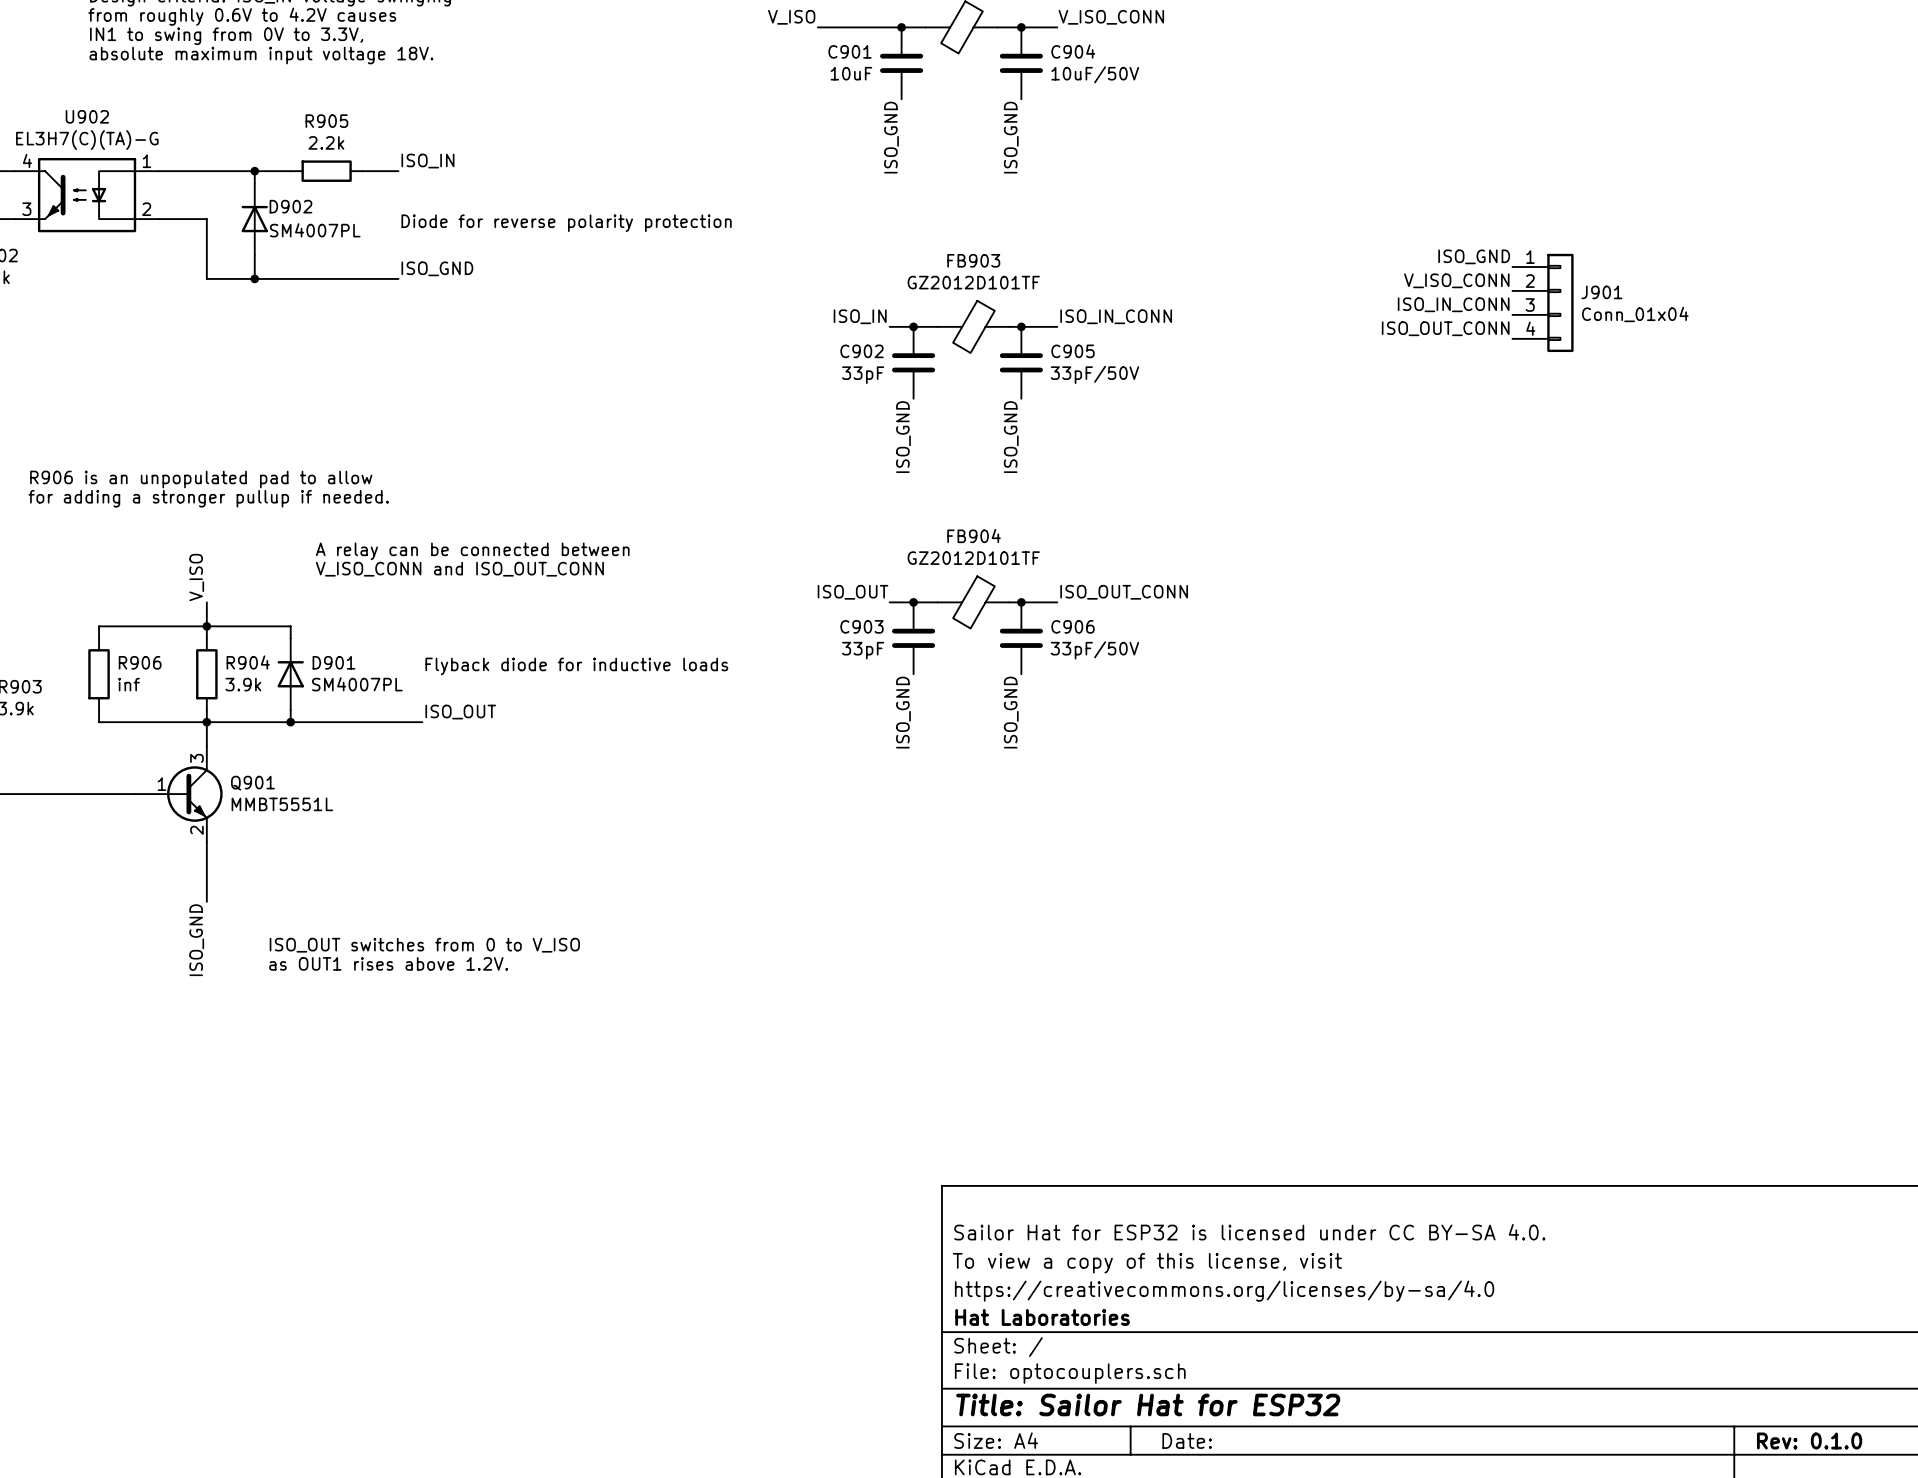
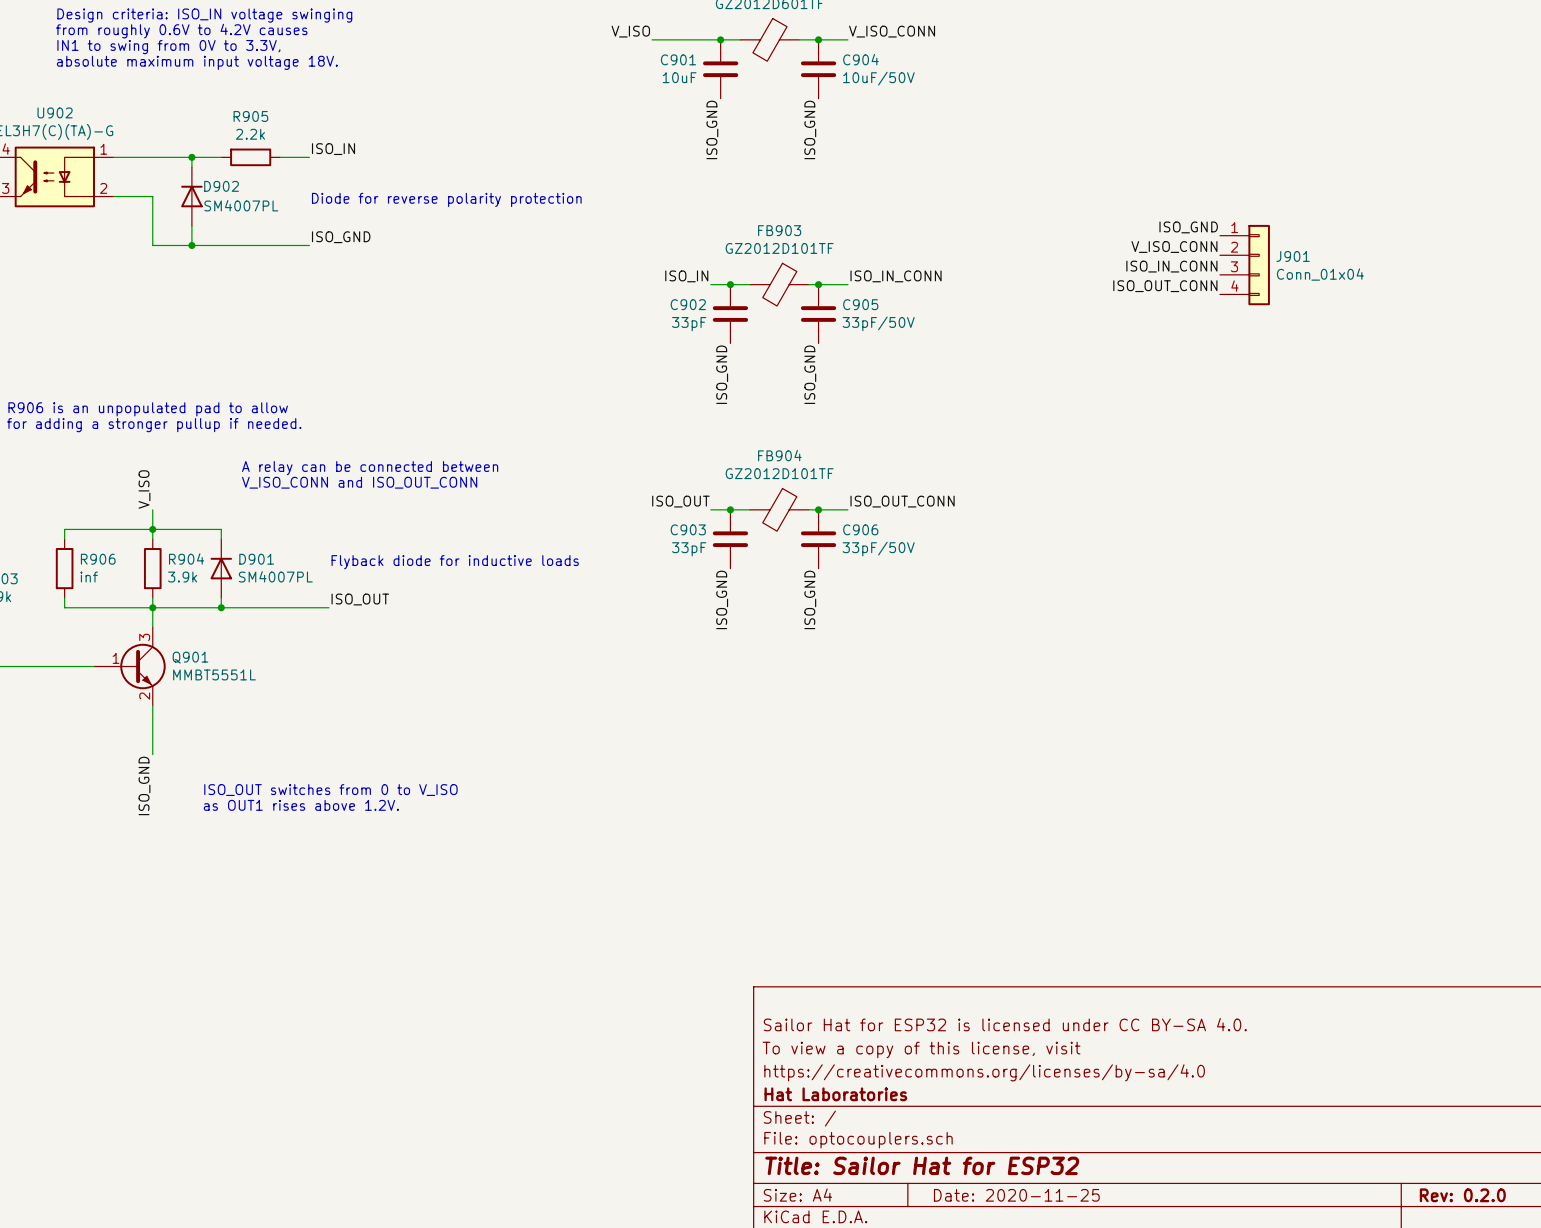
title block: Date: (1187, 1441) -> Date: 2020-11-25 (1016, 1195)
title block: Rev: 0.1.0 (1809, 1441) -> Rev: 0.2.0 (1462, 1195)

